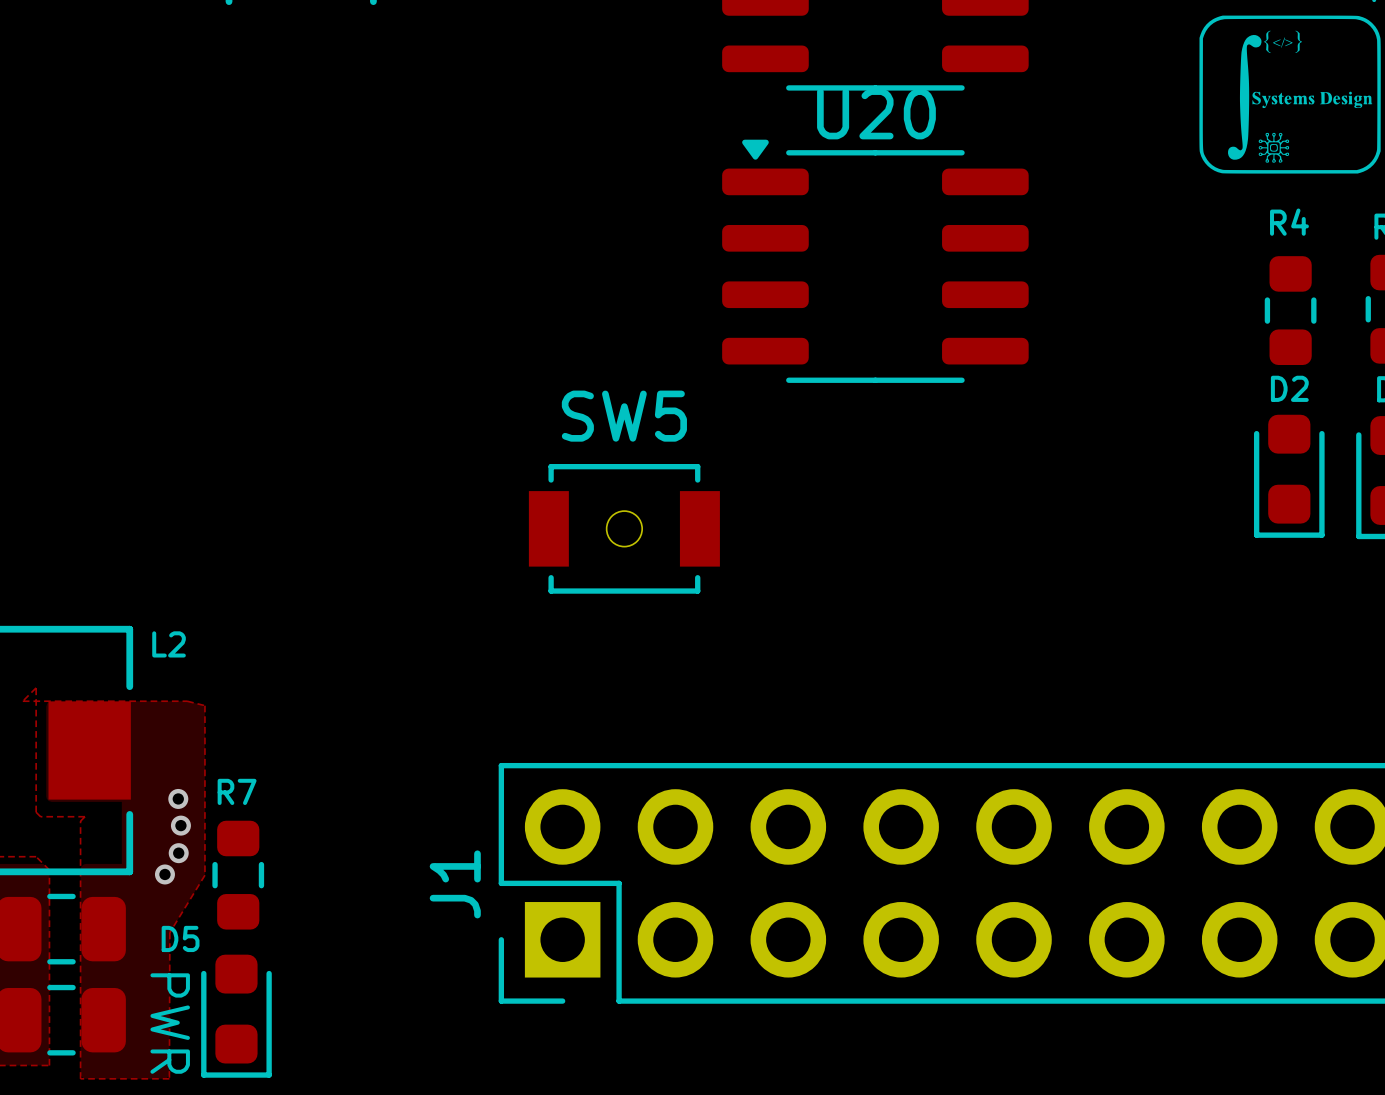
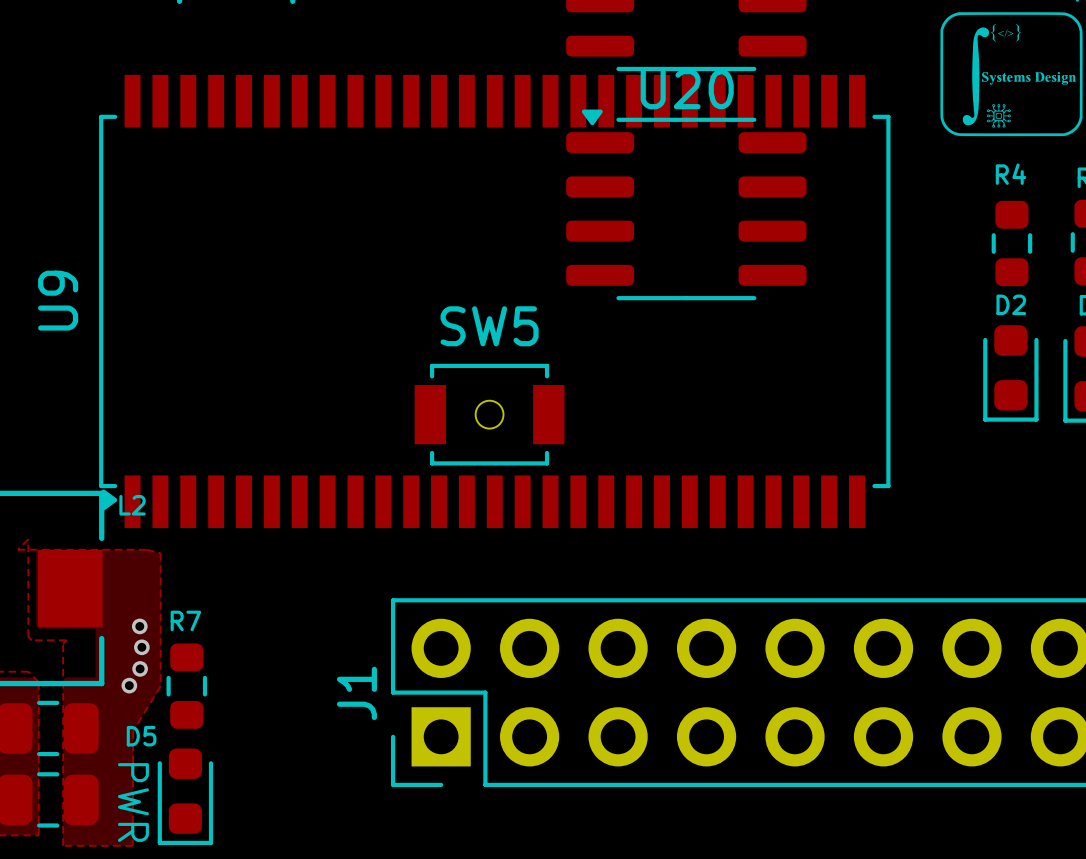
U9: none -> (494, 301)

